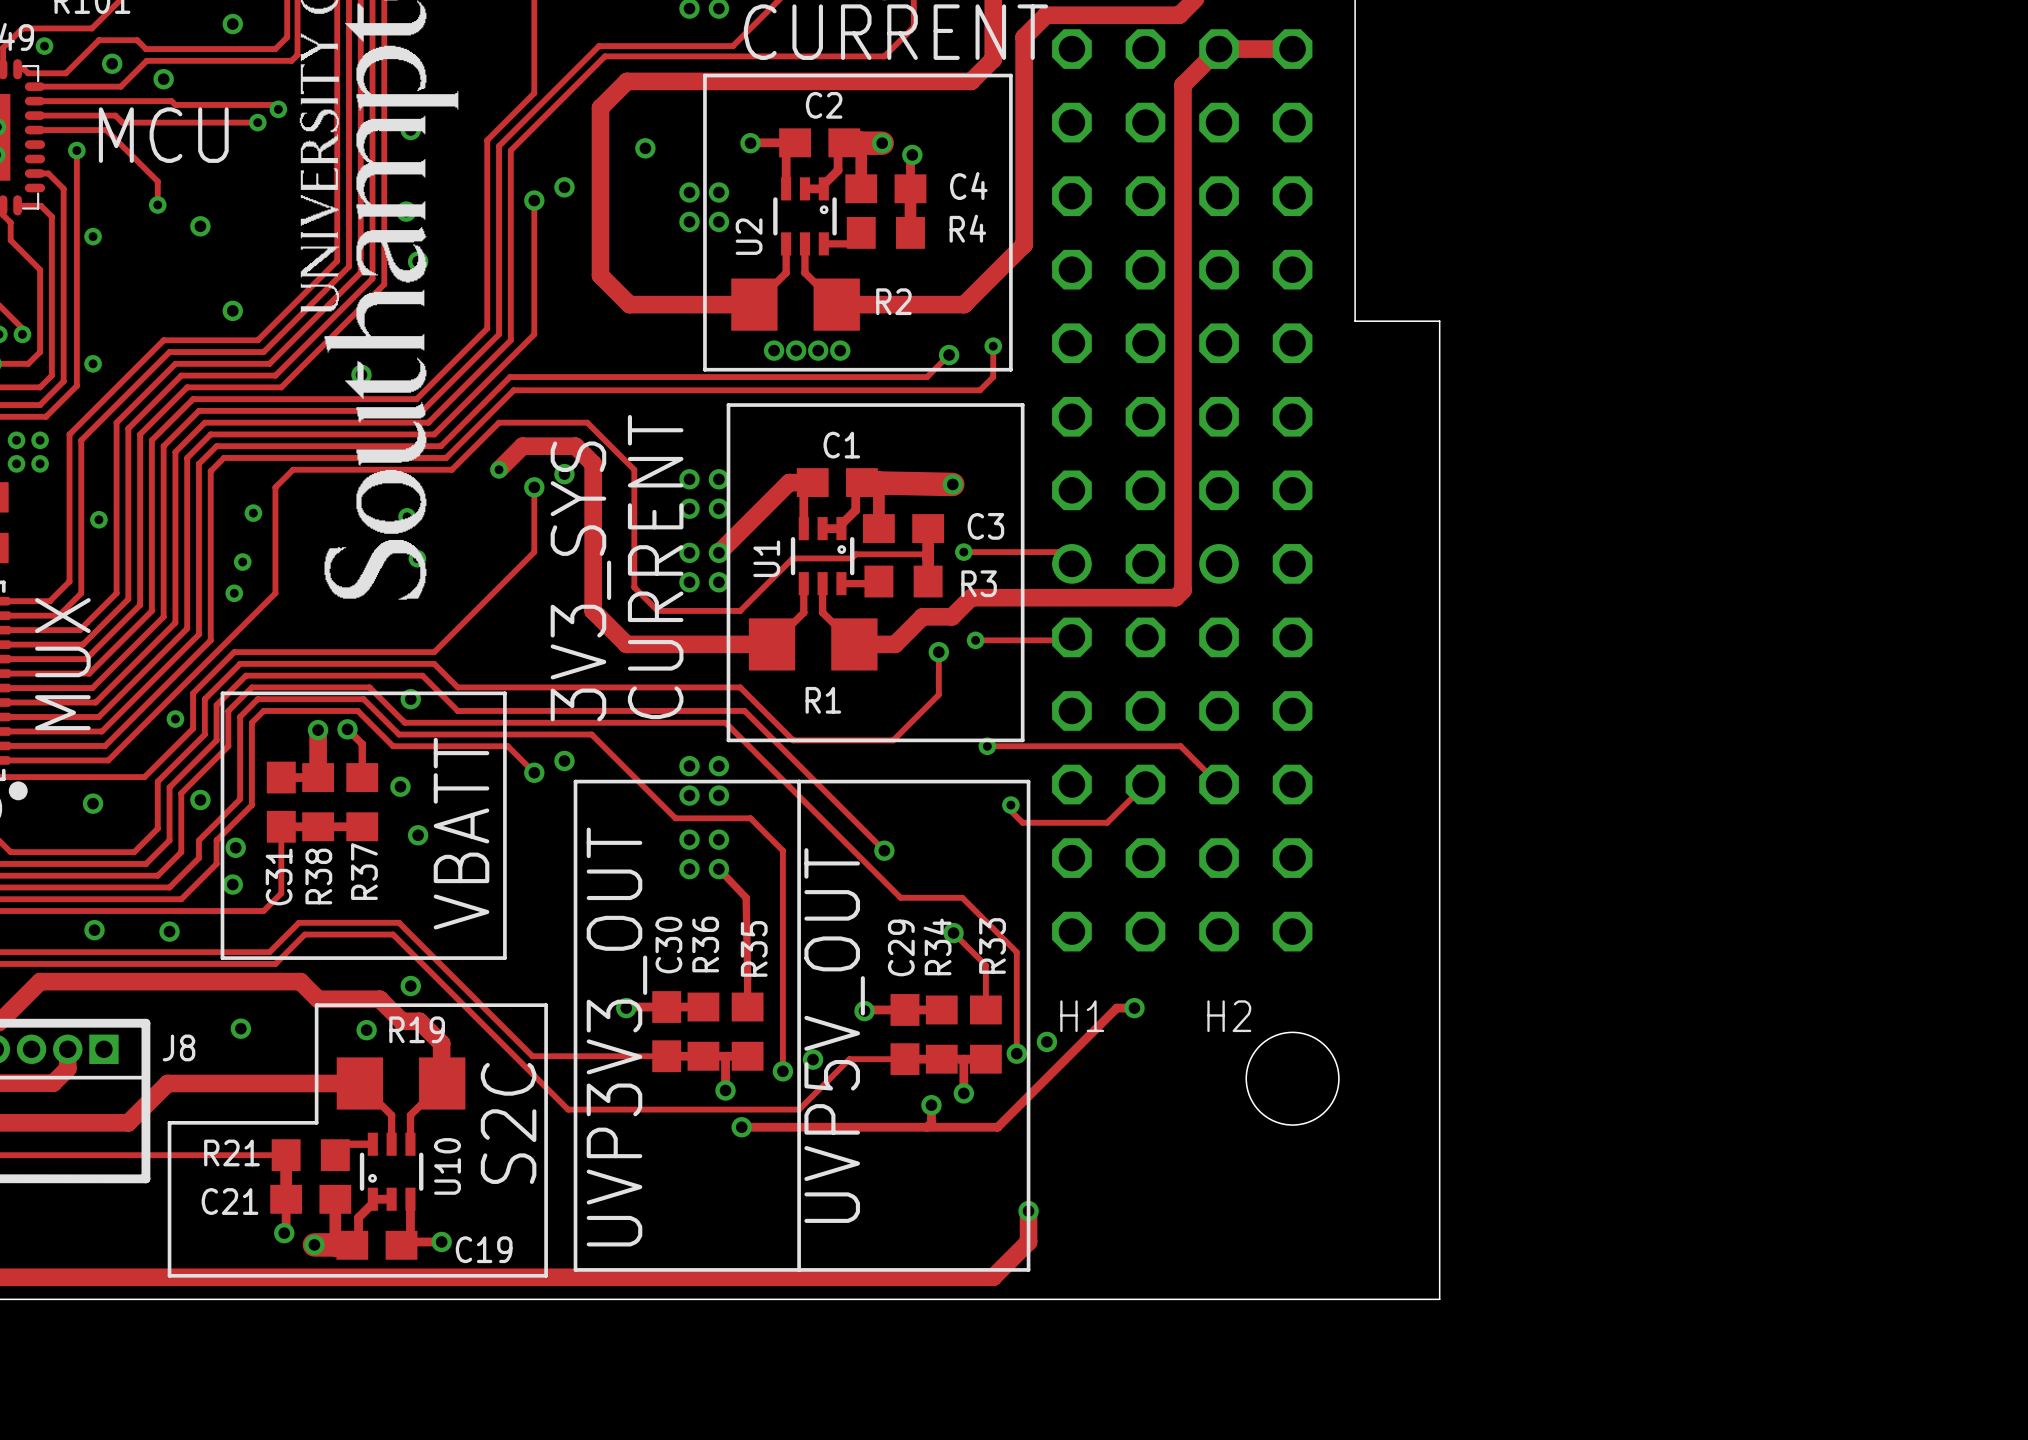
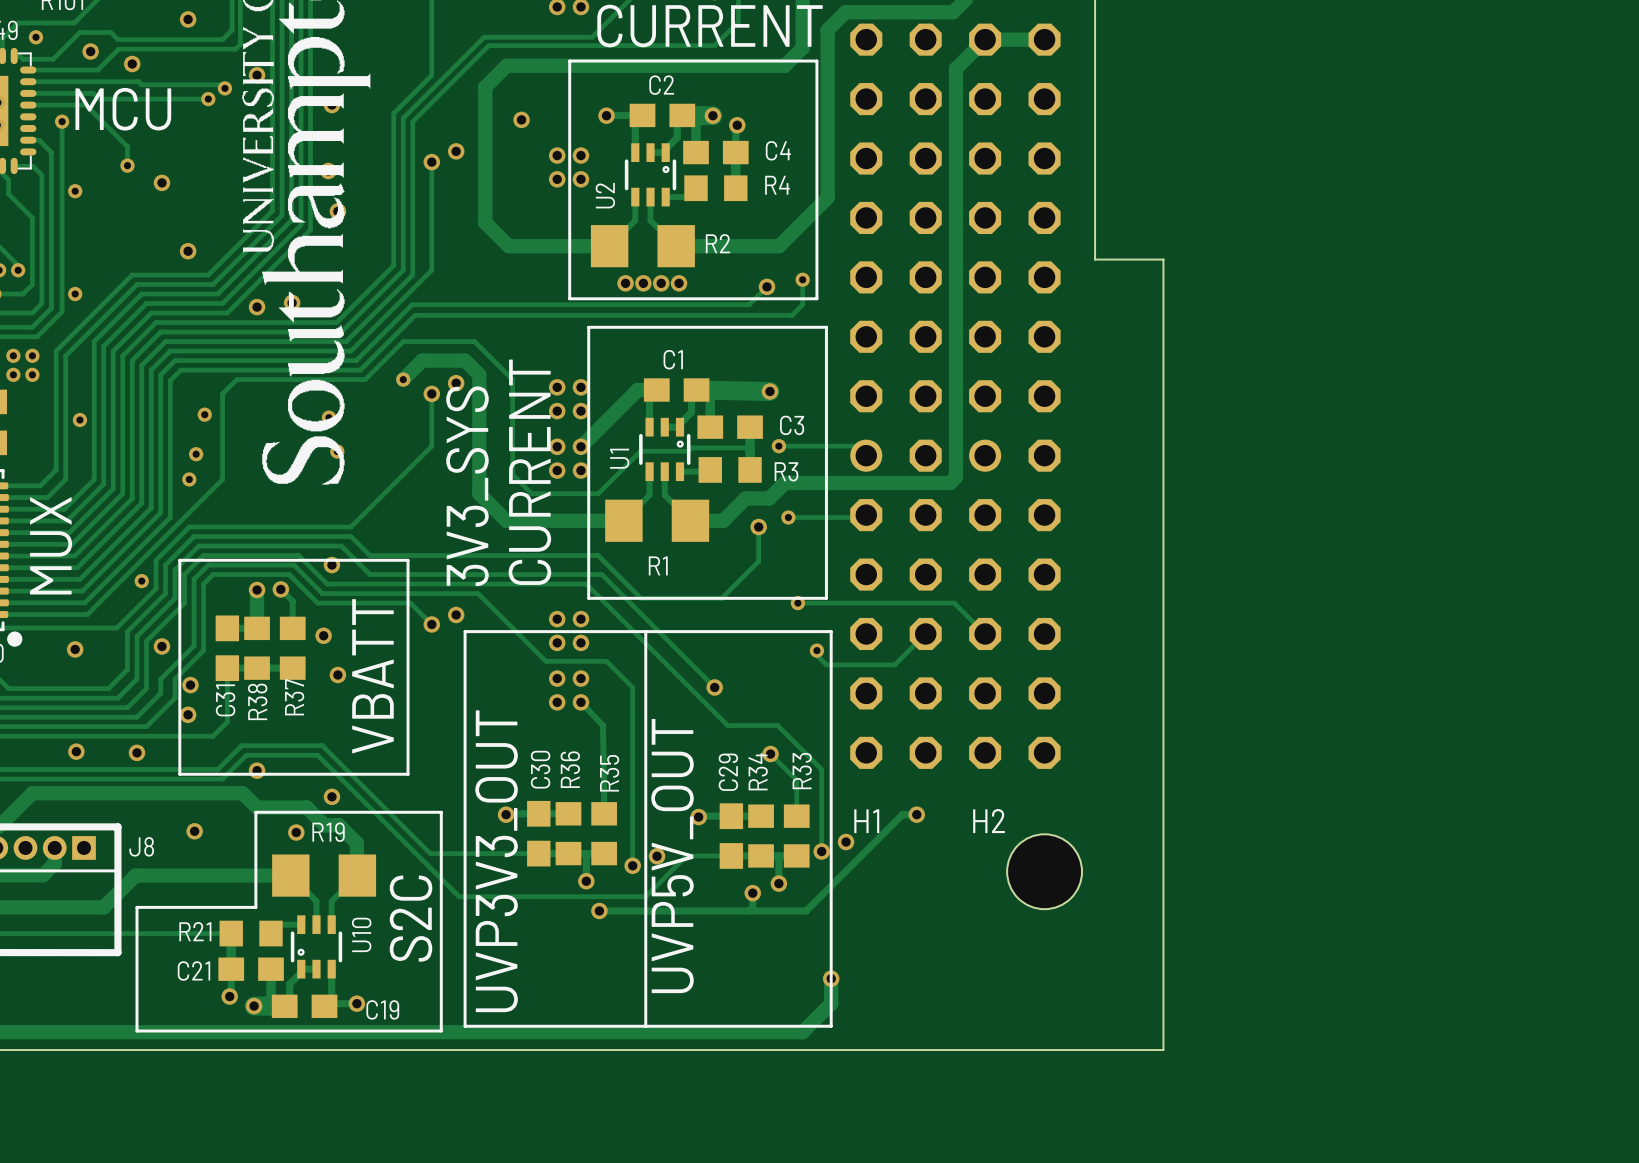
via: none -> (257, 75)
via: none -> (257, 307)
via: none -> (257, 770)

